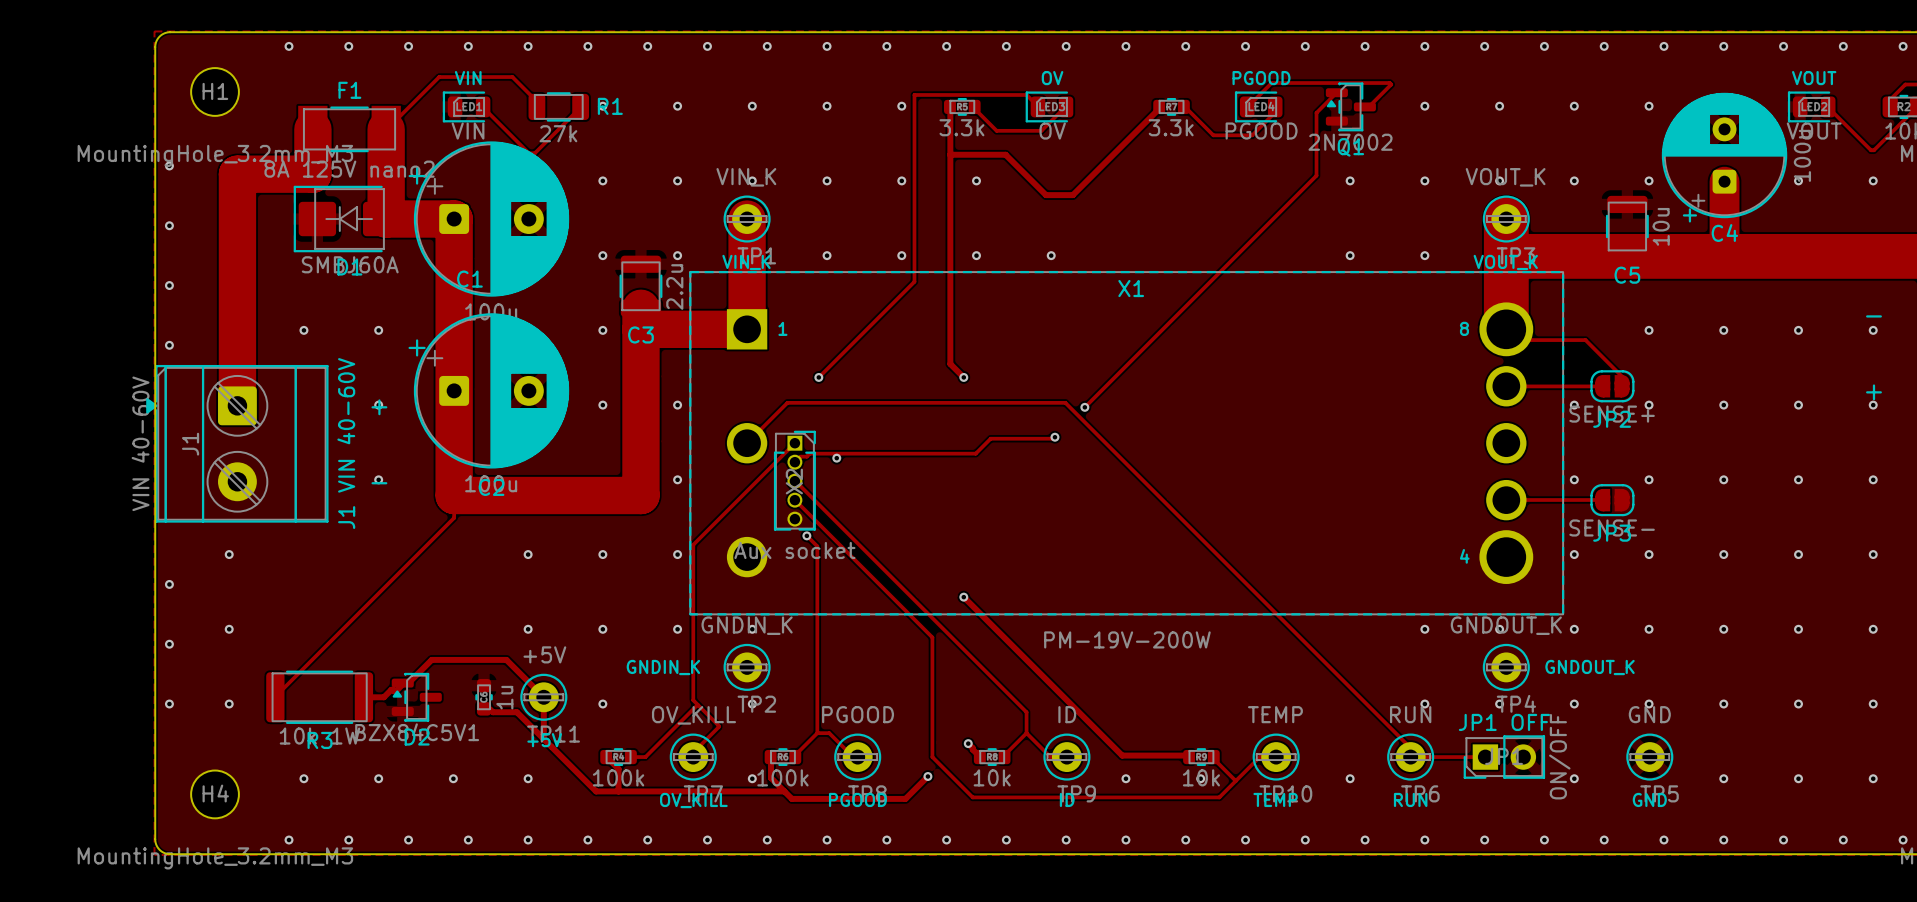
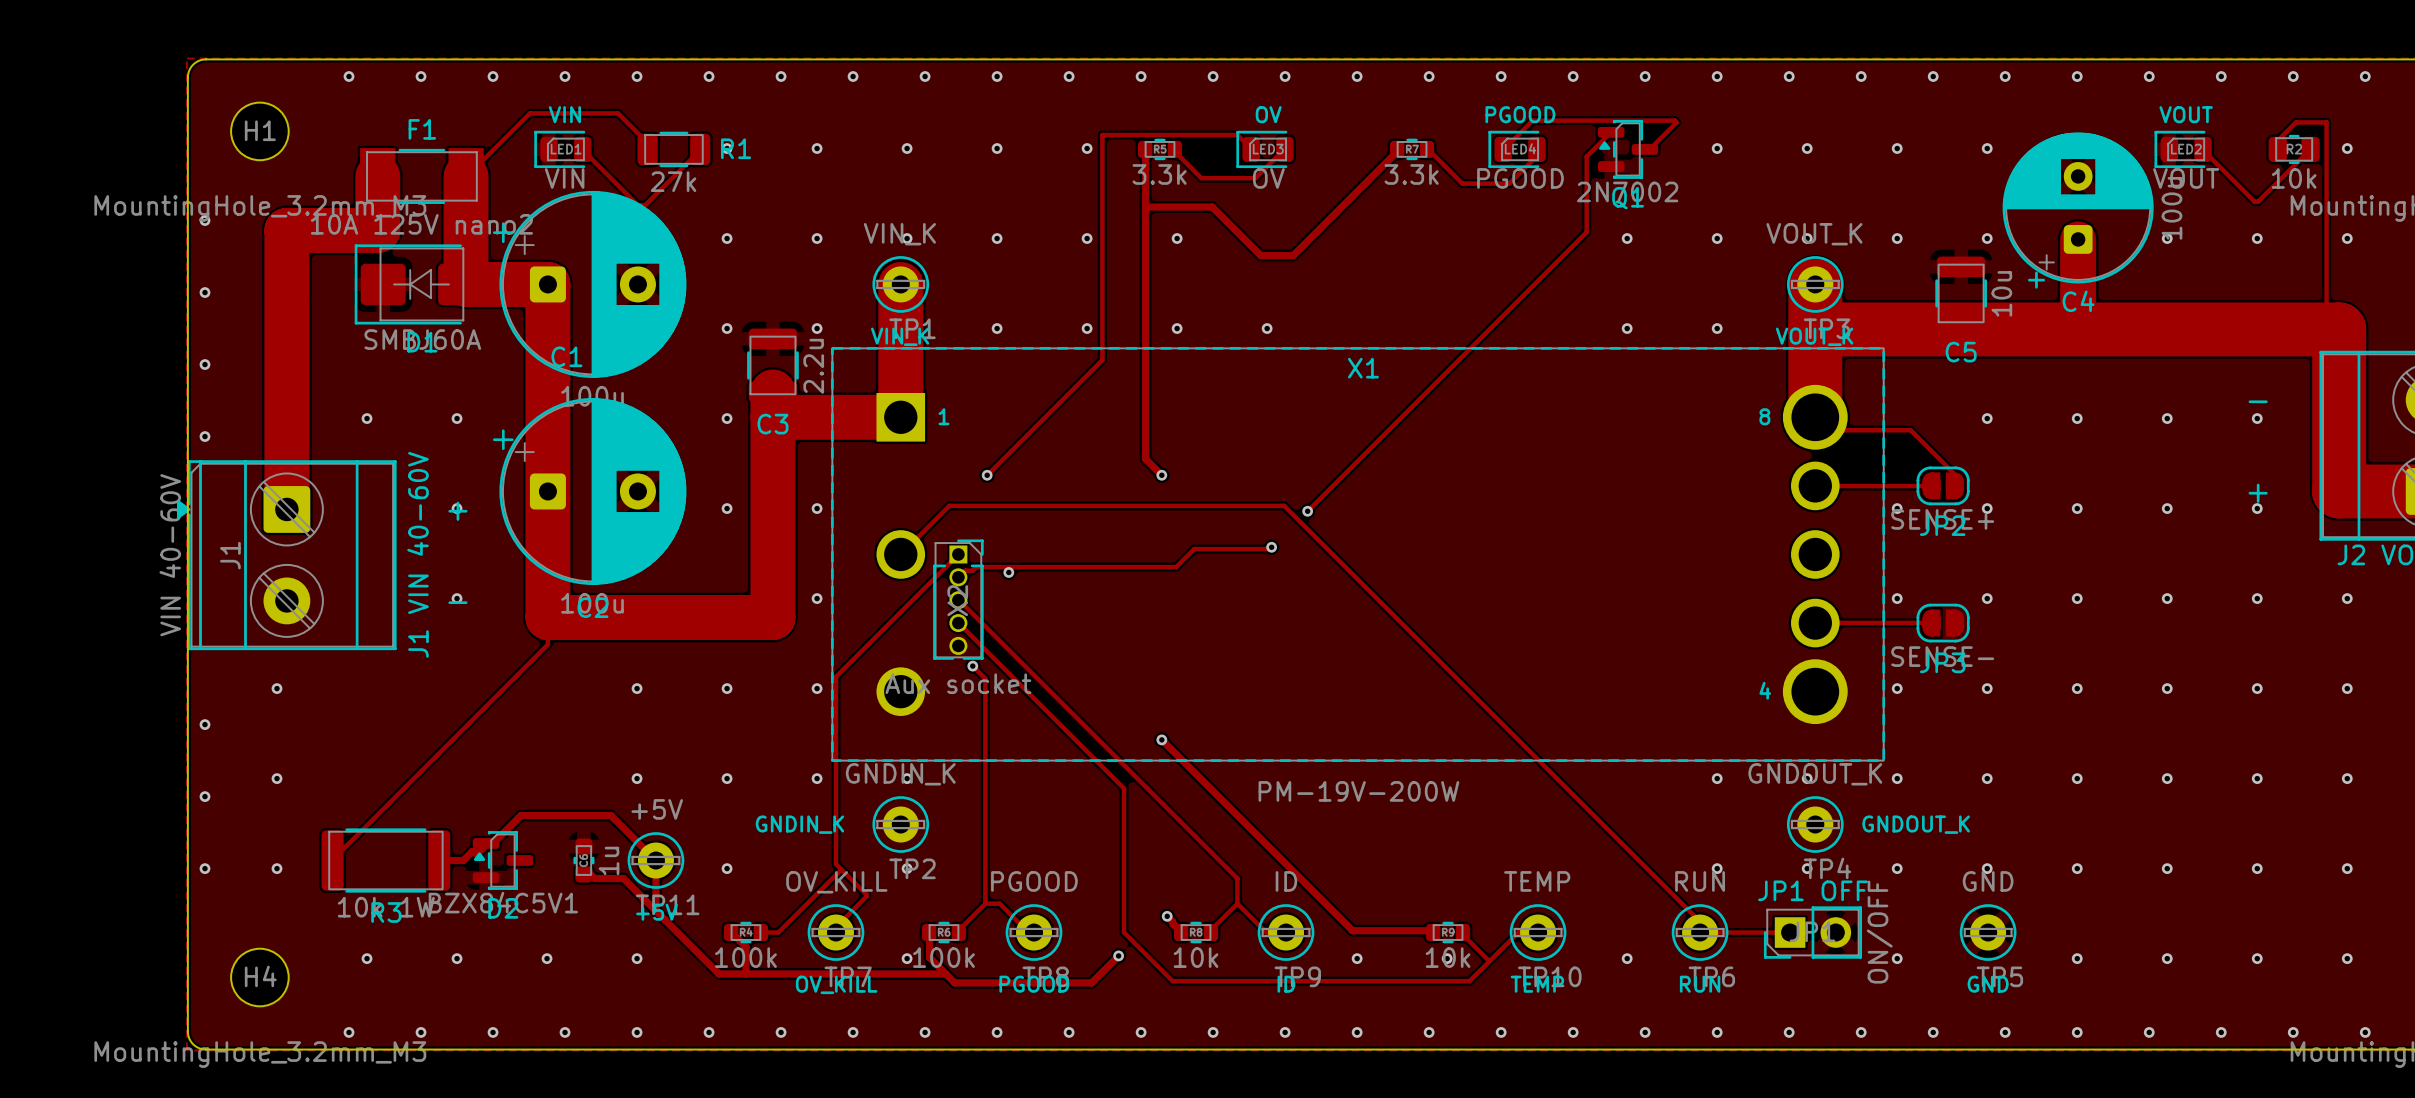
F1 value: 8A 125V nano2 (349, 169) -> 10A 125V nano2 (421, 224)

